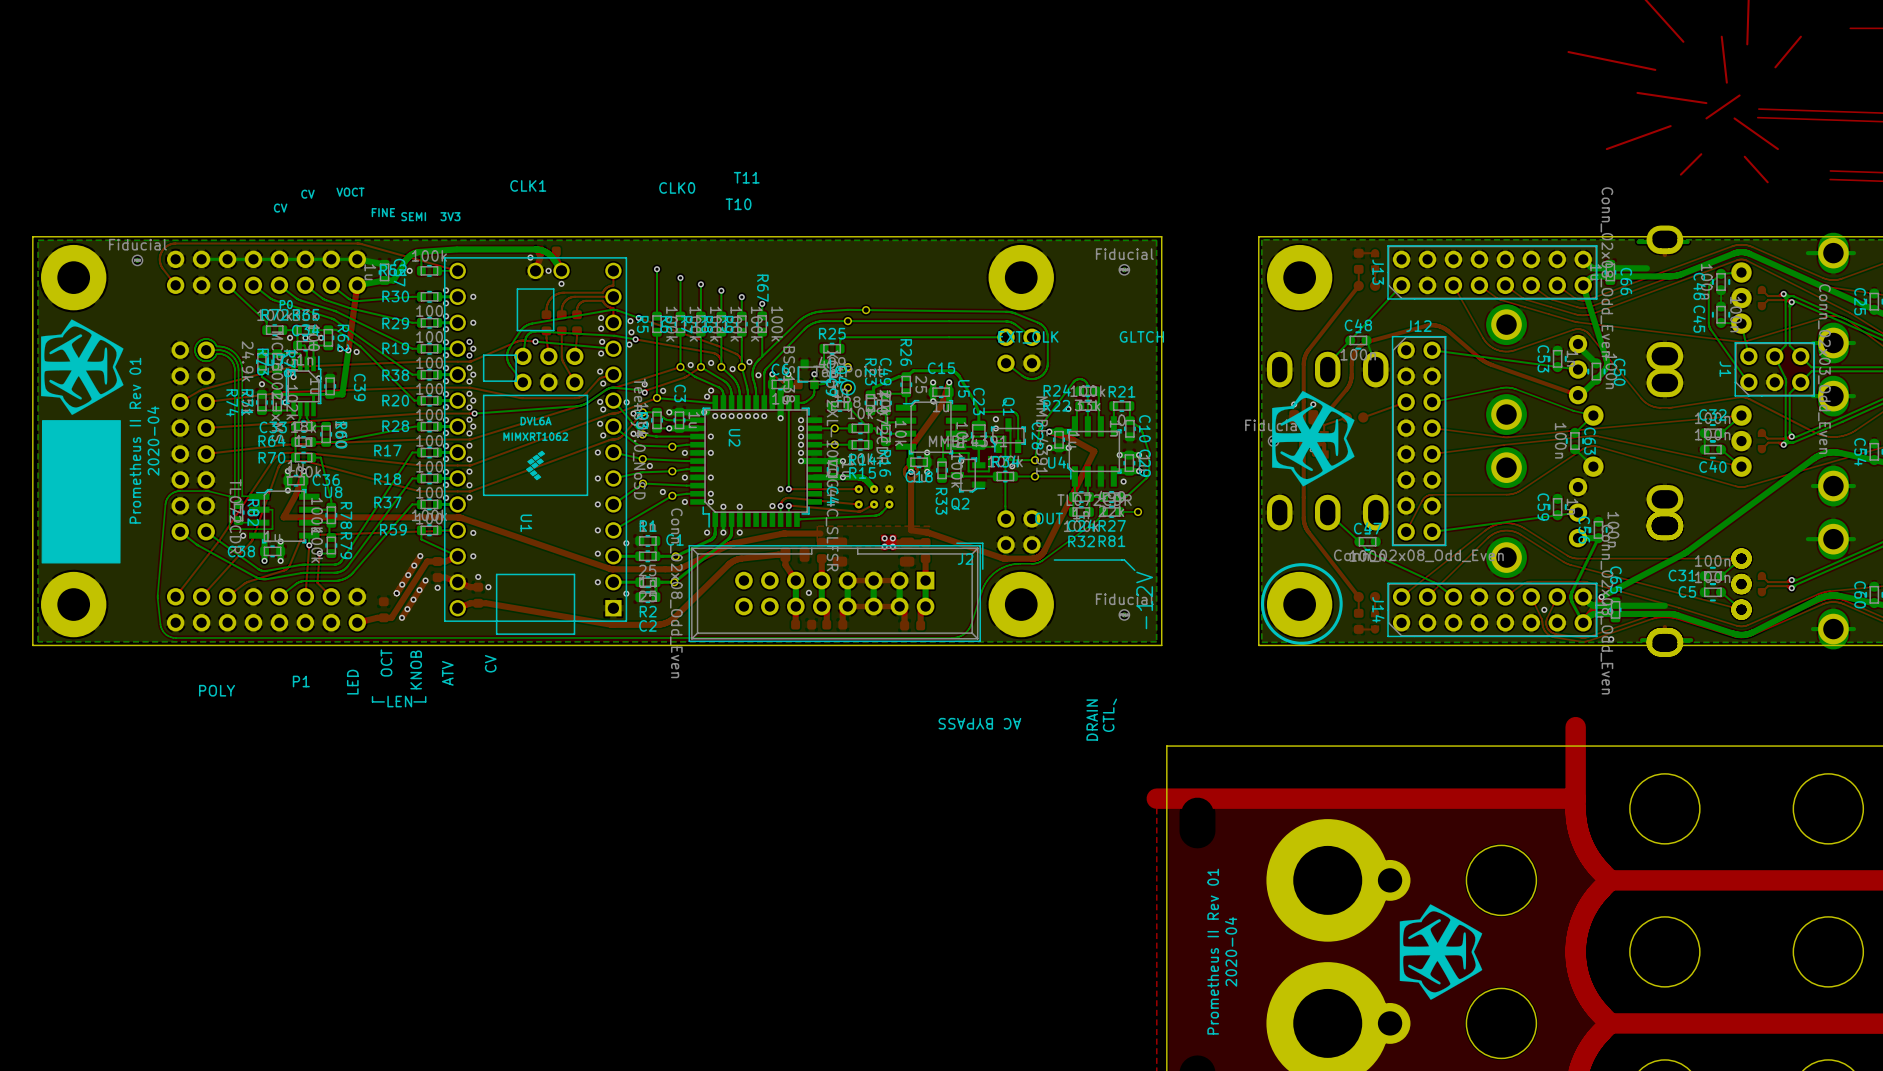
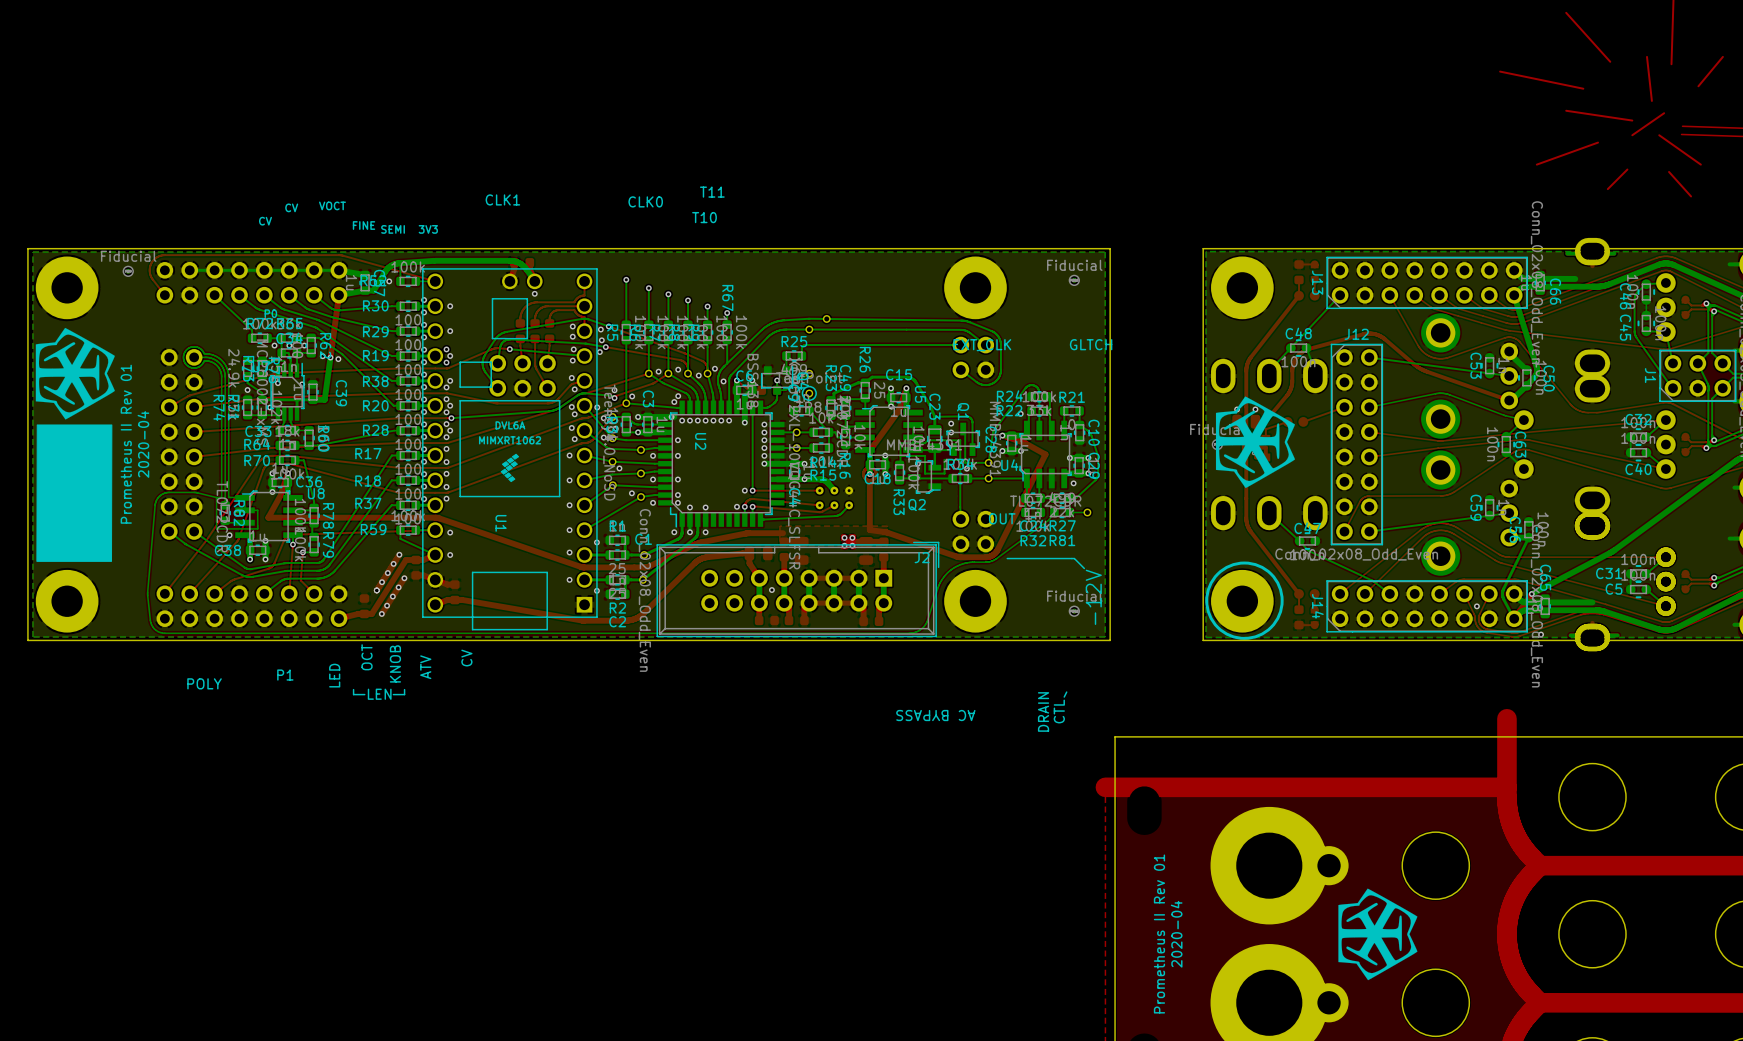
via: (530, 257) -> none
via: (548, 270) -> none
via: (469, 367) -> none
via: (478, 576) -> none
via: (437, 587) -> none
via: (488, 587) -> none

